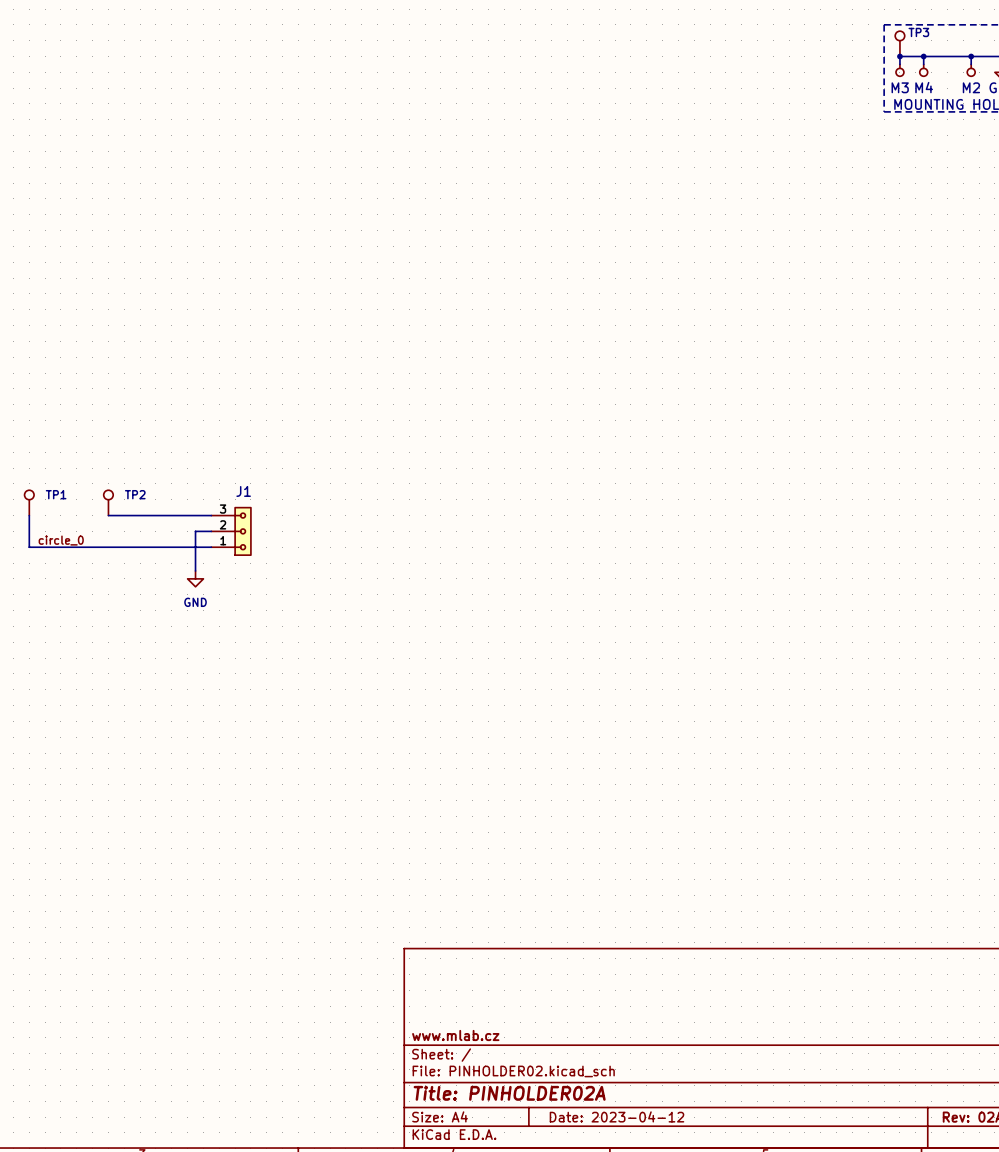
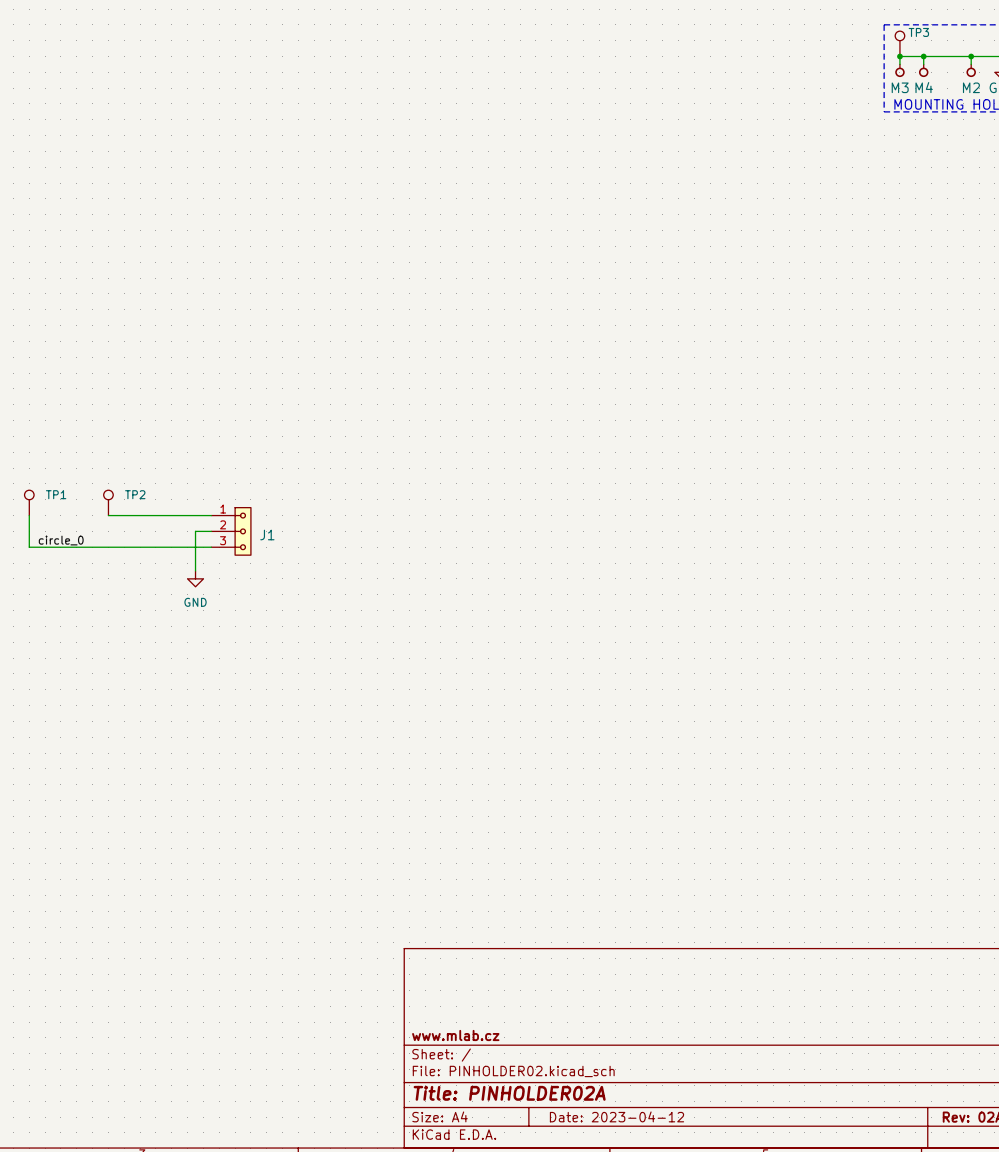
J1 name position: J1 (243, 491) -> J1 (267, 535)
J1 flip: as is (243, 531) -> up-down (243, 531)

